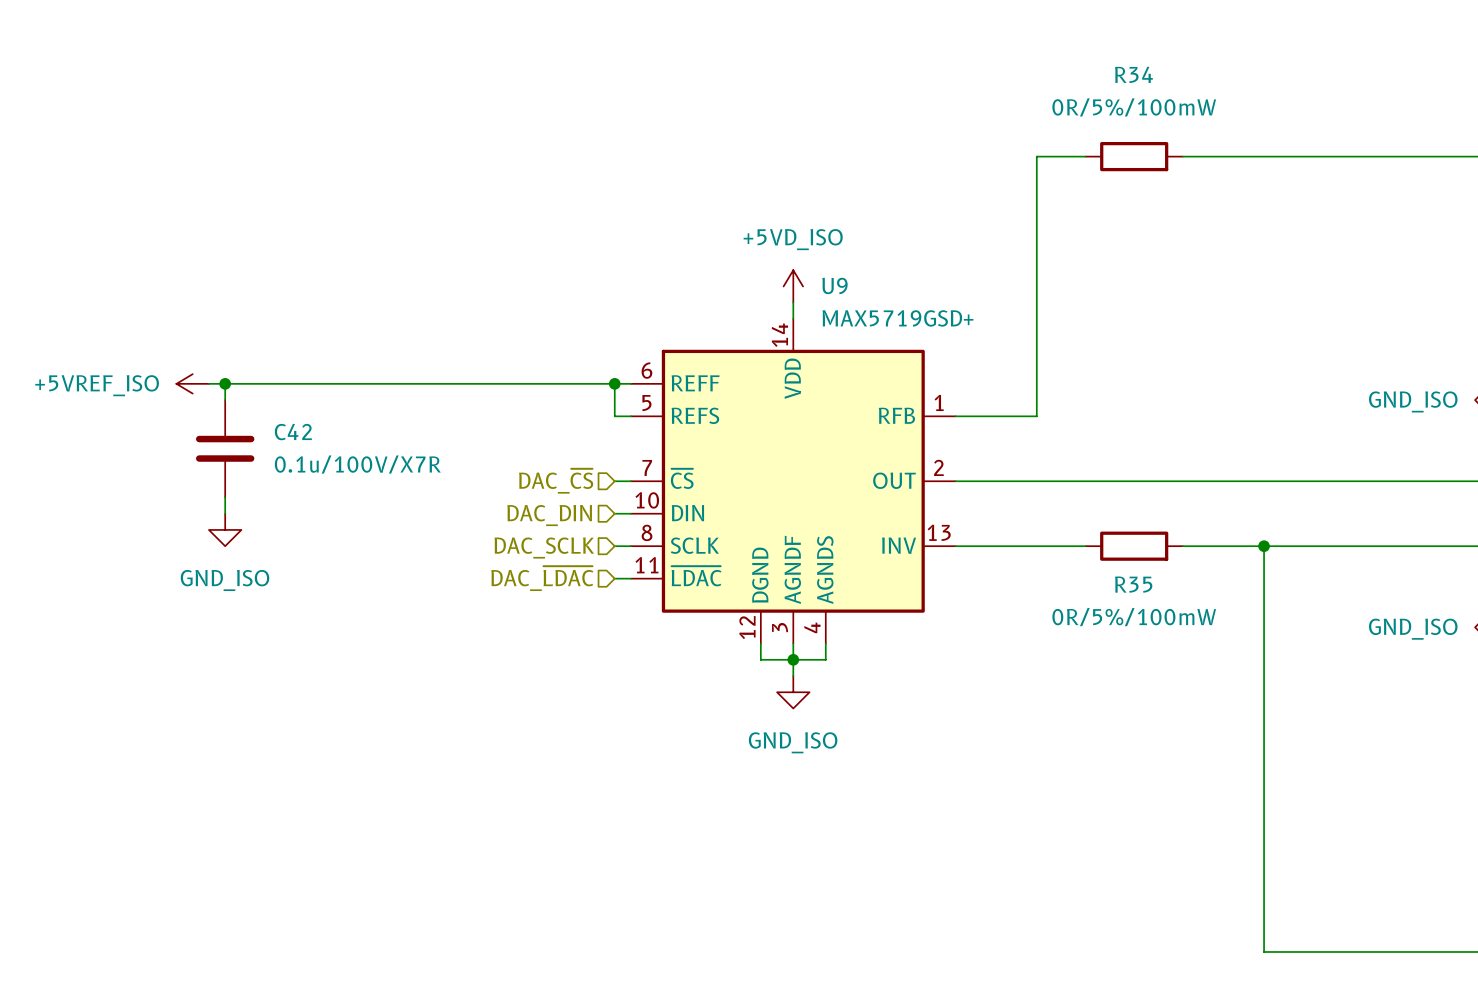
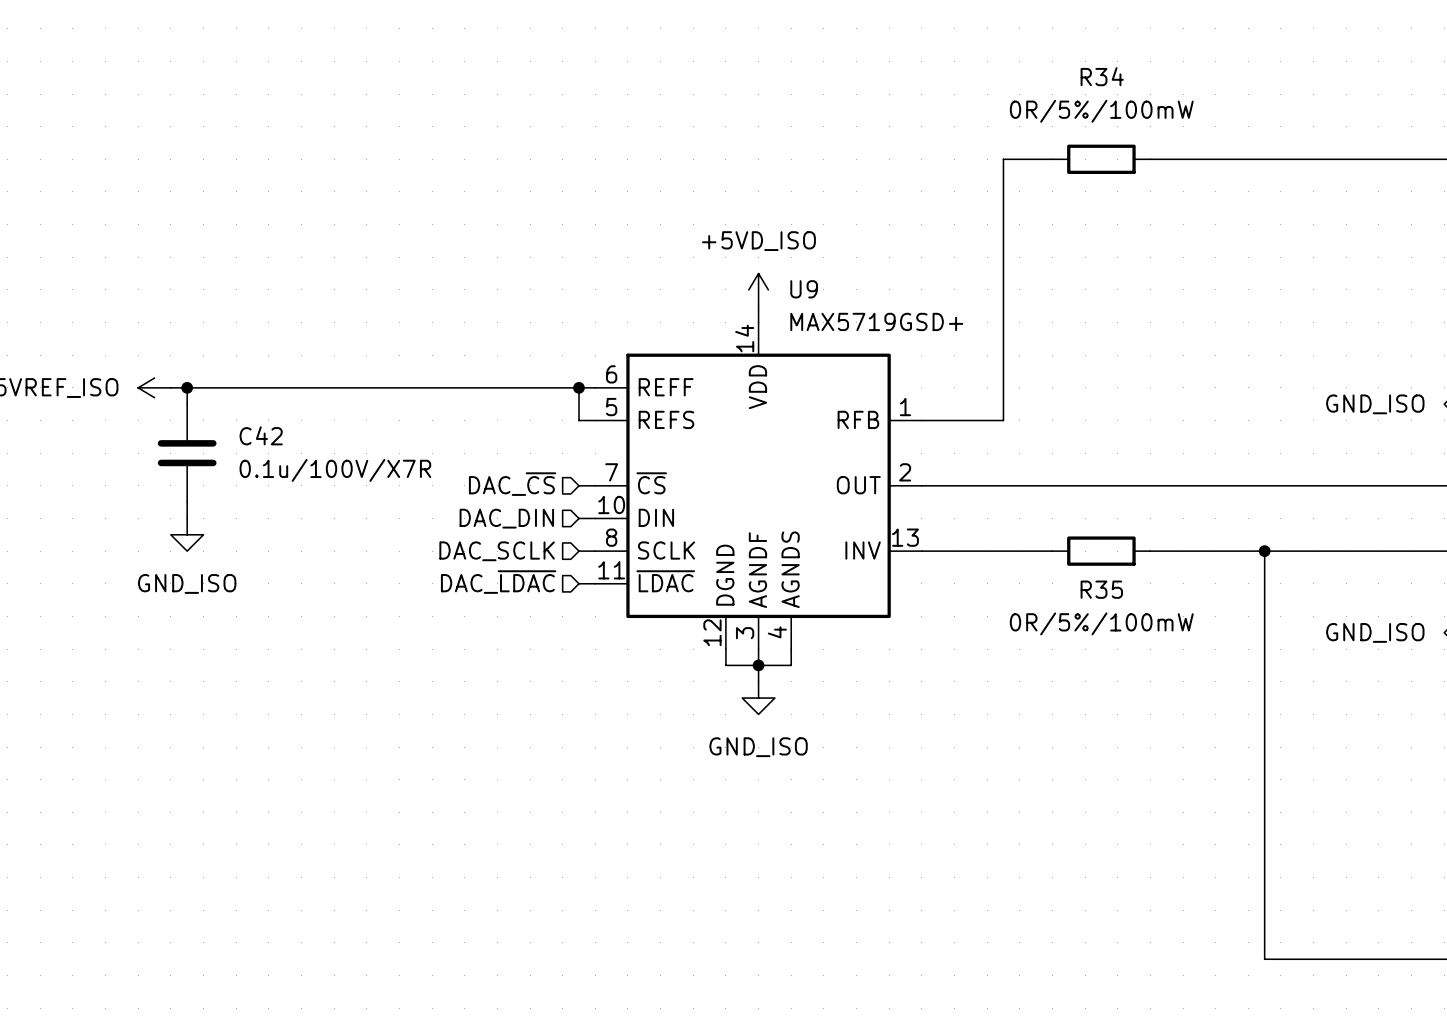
wire: (1264, 546) (1264, 951) (1296, 951) -> (1264, 551) (1264, 959)
junction position: (1264, 546) -> (1264, 551)

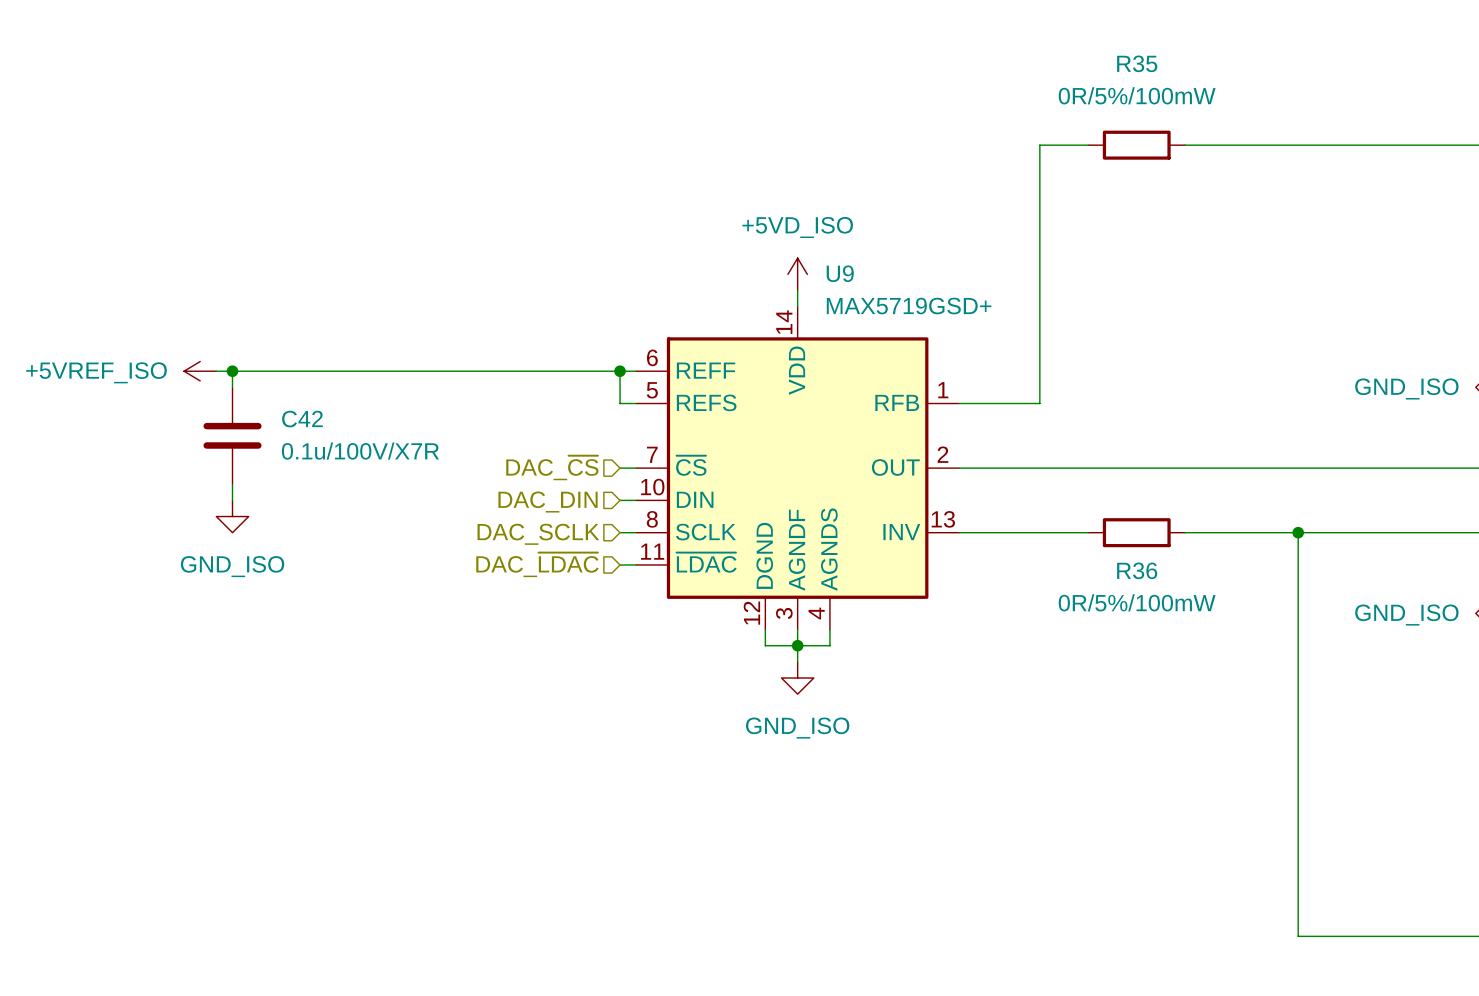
R34 name: R34 (1102, 76) -> R35 (1137, 63)
R35 name: R35 (1101, 589) -> R36 (1137, 570)

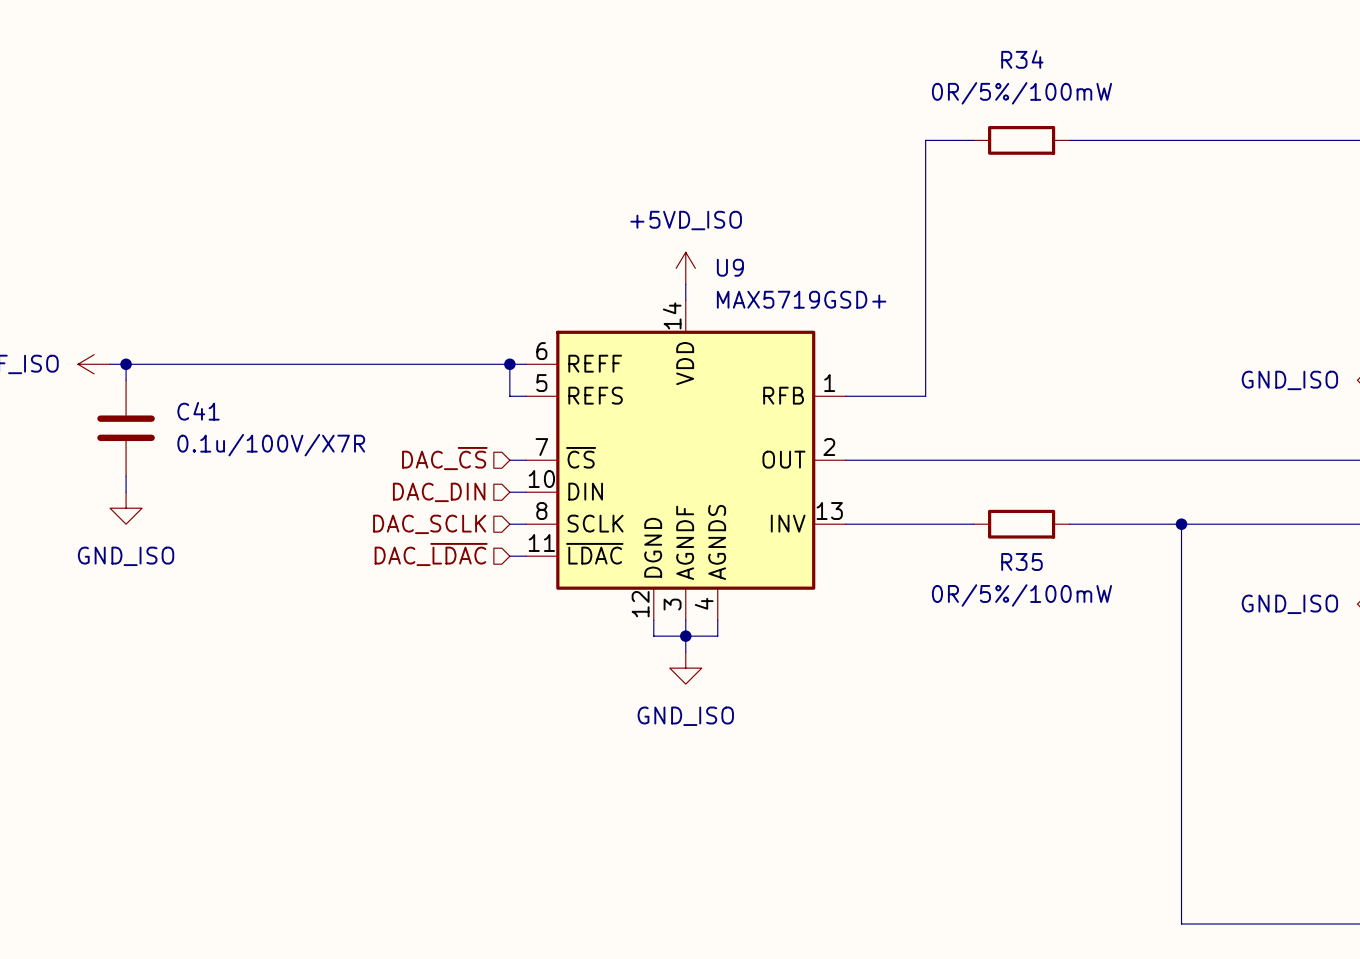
R35 name: R35 (1137, 63) -> R34 (1022, 59)
C42 name: C42 (302, 419) -> C41 (198, 411)
R36 name: R36 (1137, 570) -> R35 (1021, 561)

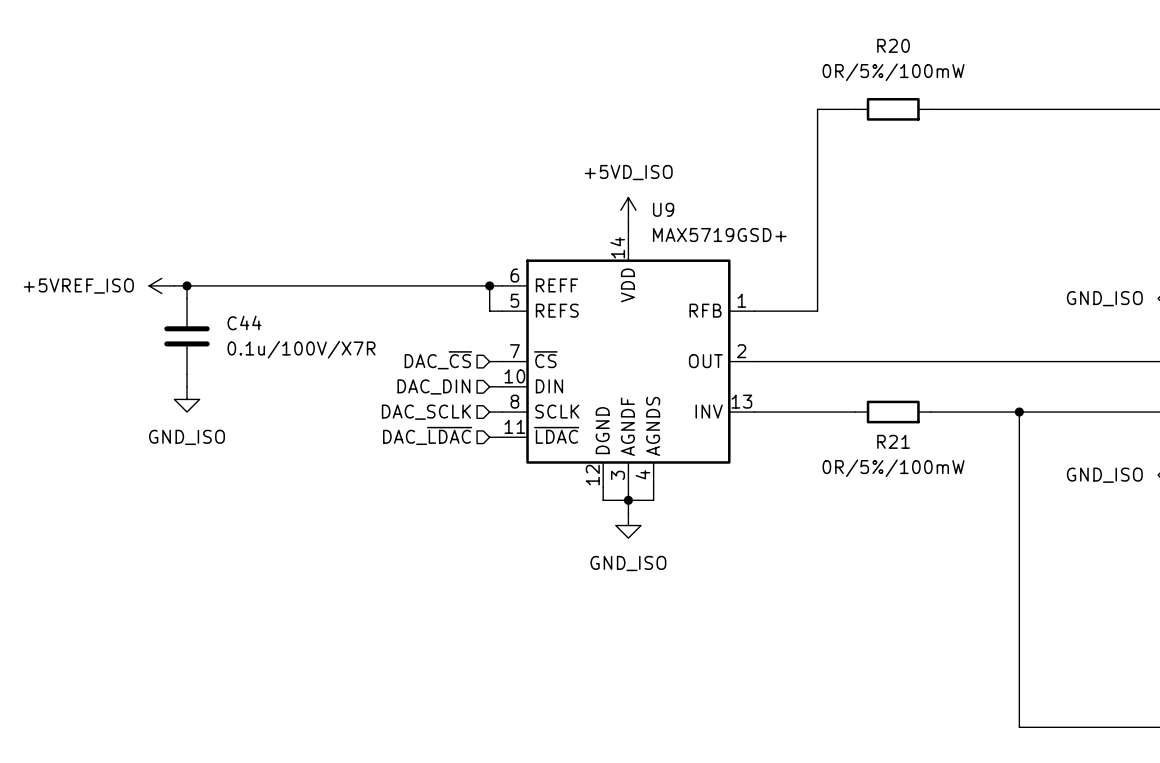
R34 name: R34 (1022, 59) -> R20 (893, 45)
C41 name: C41 (198, 411) -> C44 (244, 322)
R35 name: R35 (1021, 561) -> R21 (893, 441)

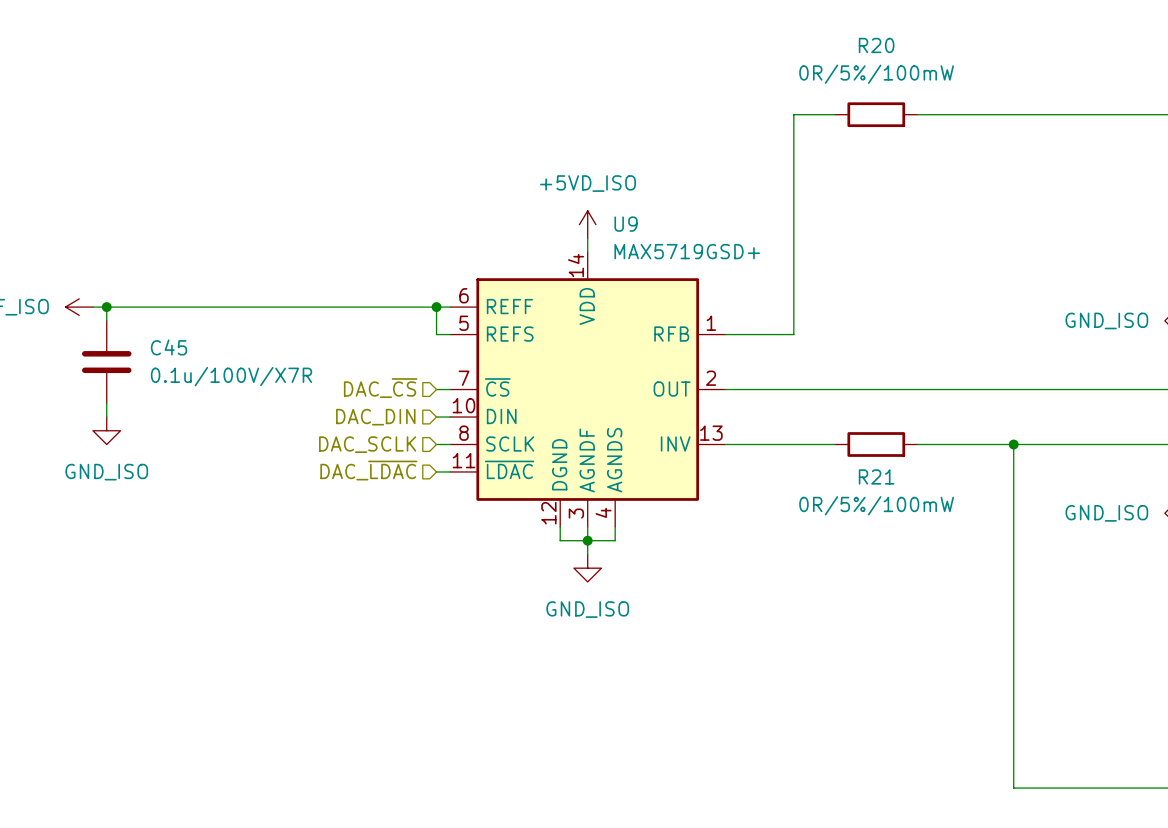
C44 name: C44 (244, 322) -> C45 (169, 347)

